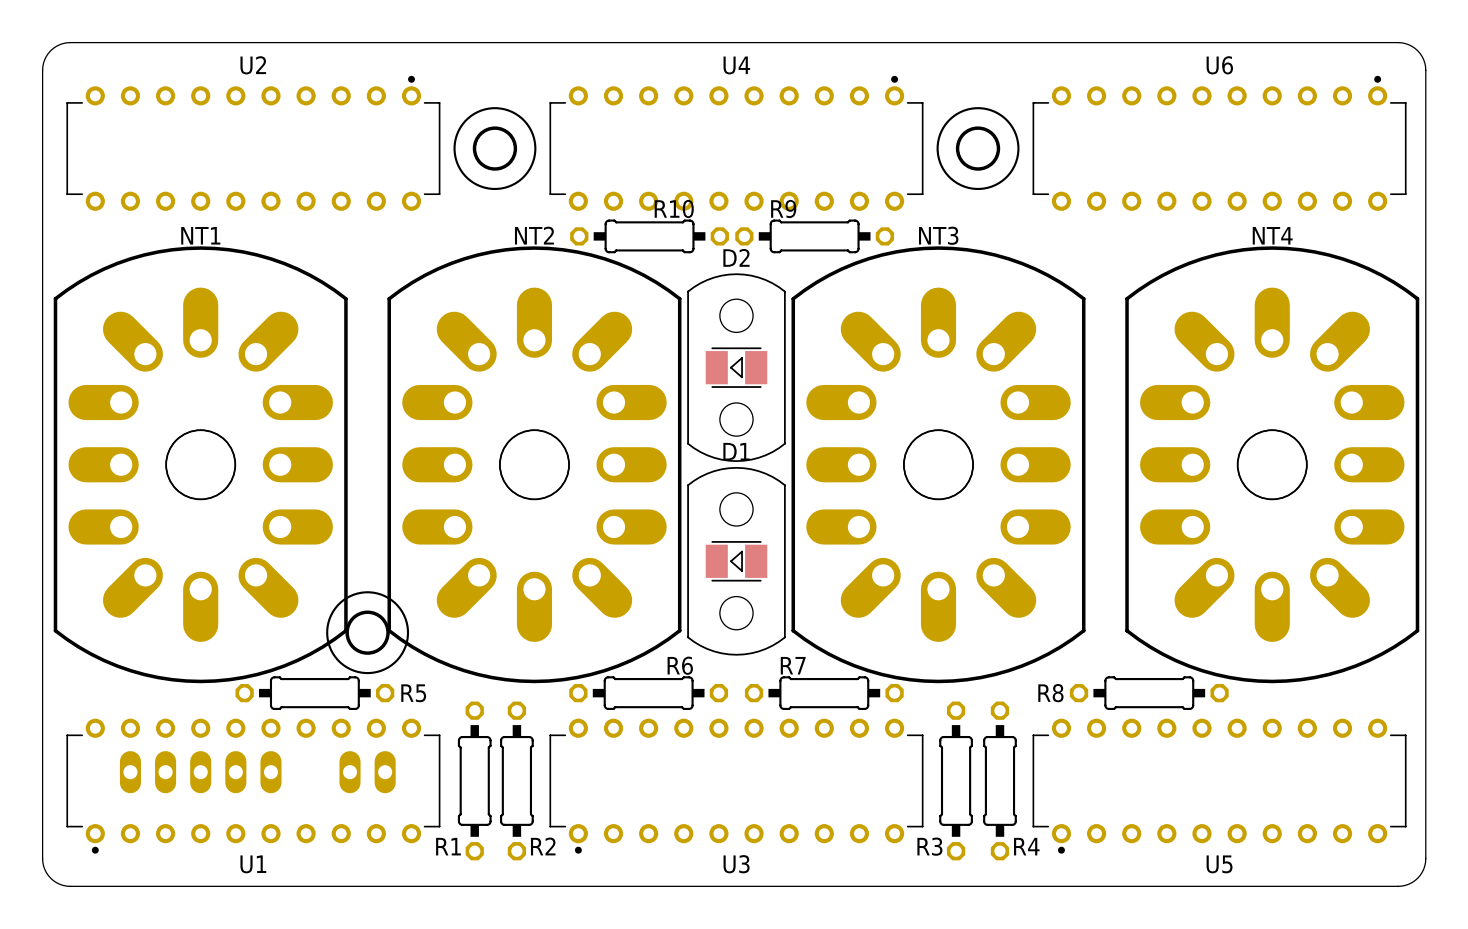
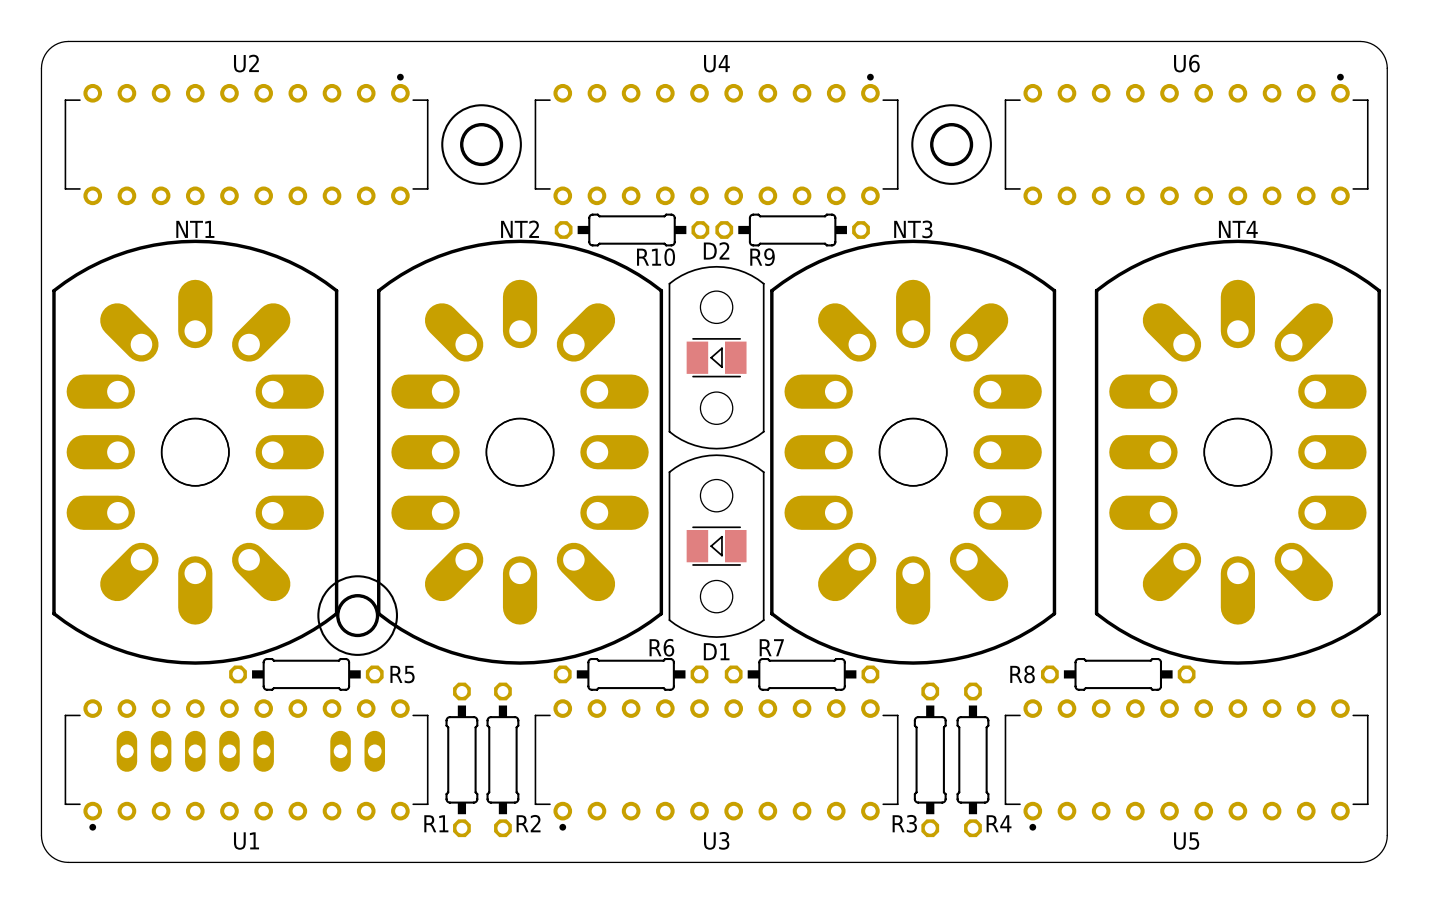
R10 name position: R10 (674, 209) -> R10 (656, 257)
R9 name position: R9 (783, 209) -> R9 (762, 257)
D1 name position: D1 (736, 451) -> D1 (716, 651)

